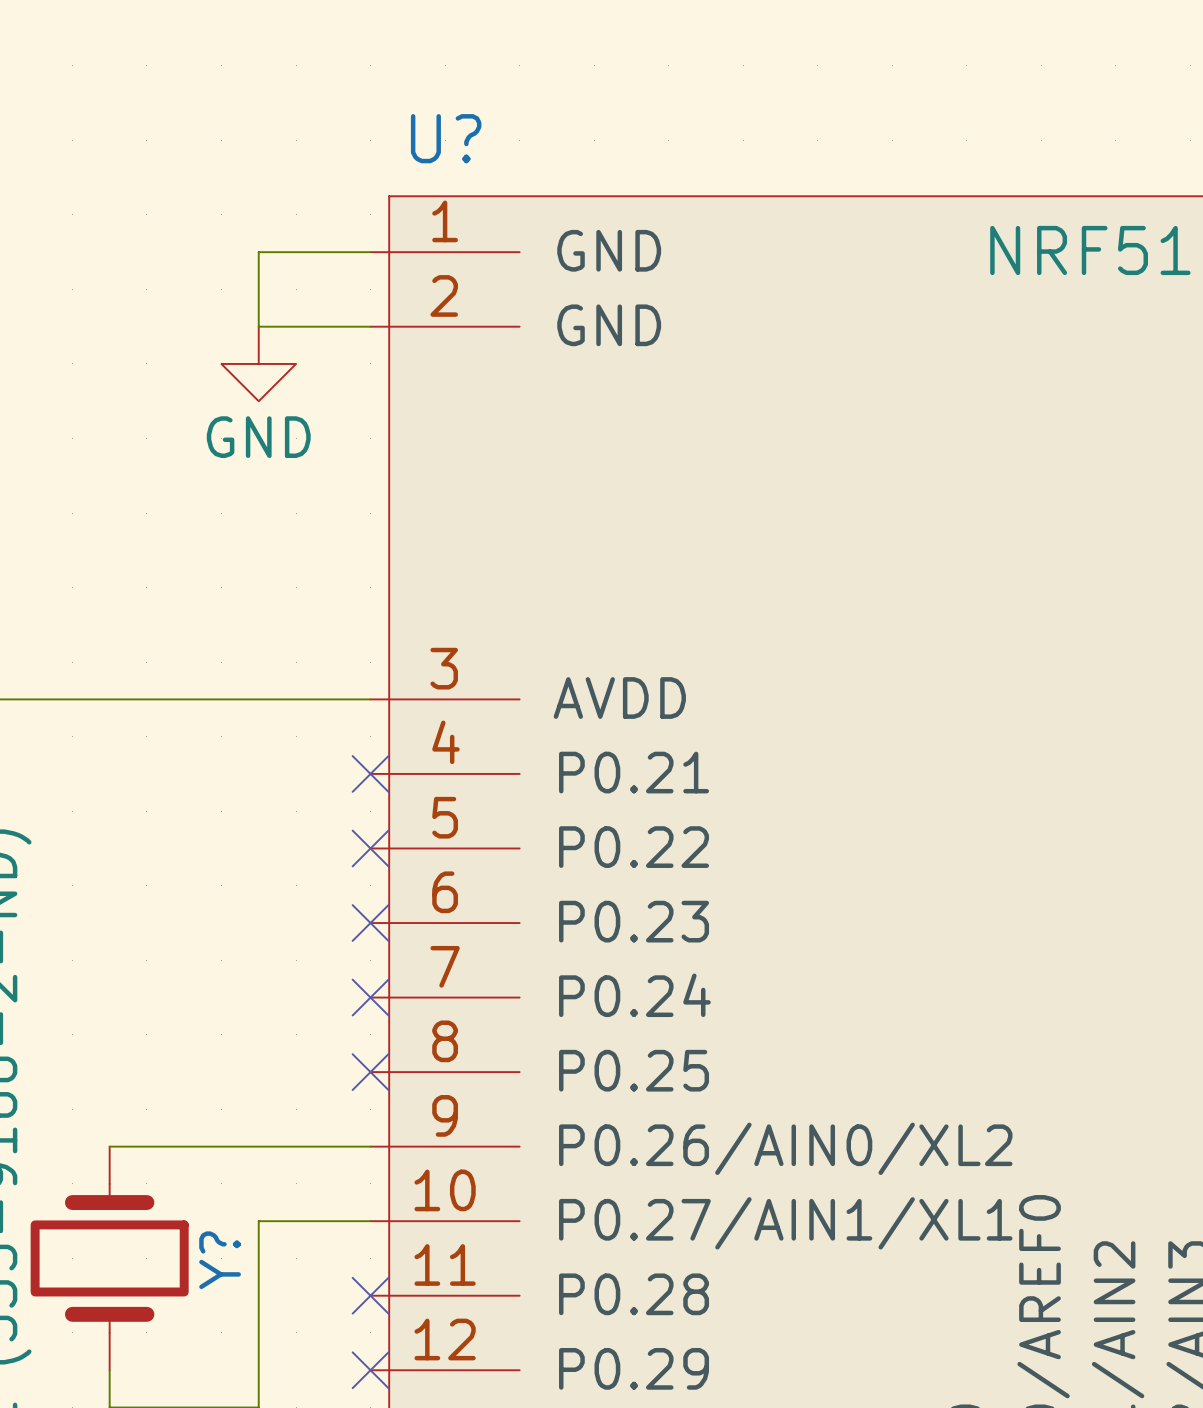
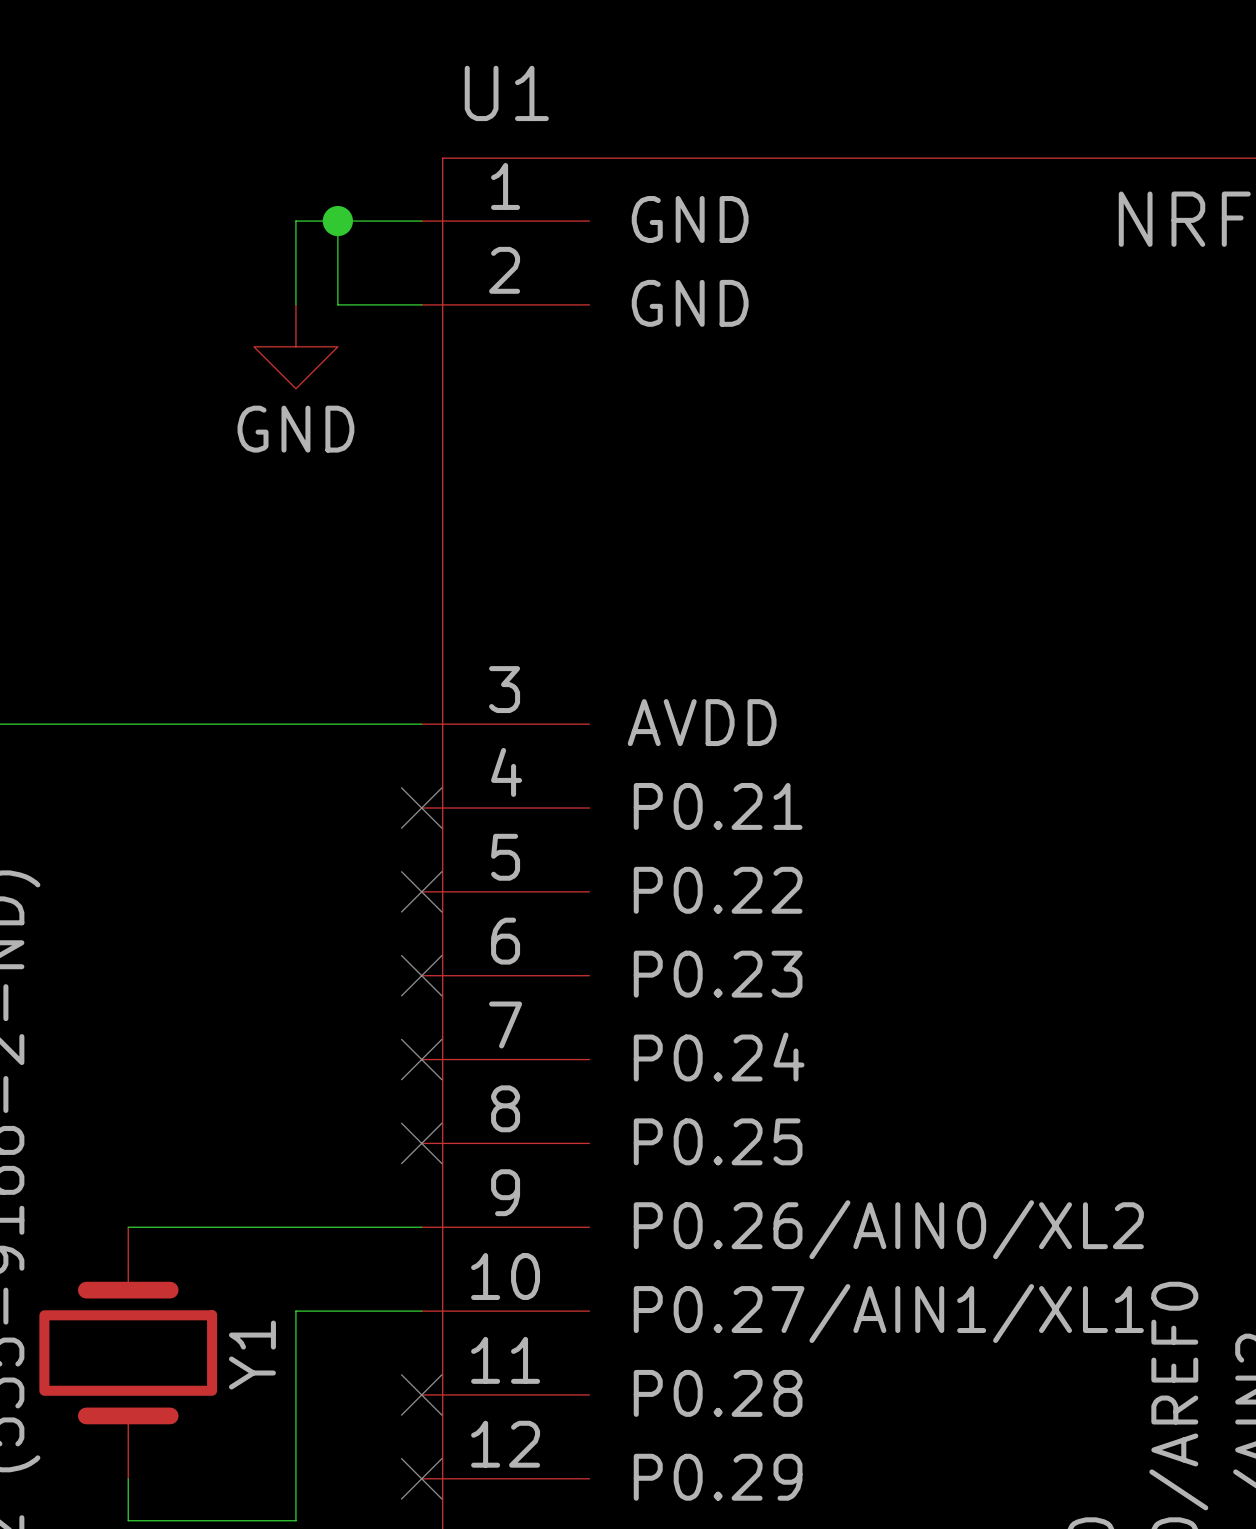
U? name: U? (446, 138) -> U1 (506, 93)
junction: none -> (337, 221)
wire: (258, 326) (296, 326) -> (337, 221) (337, 304)
Y? name: Y? (220, 1260) -> Y1 (252, 1355)

